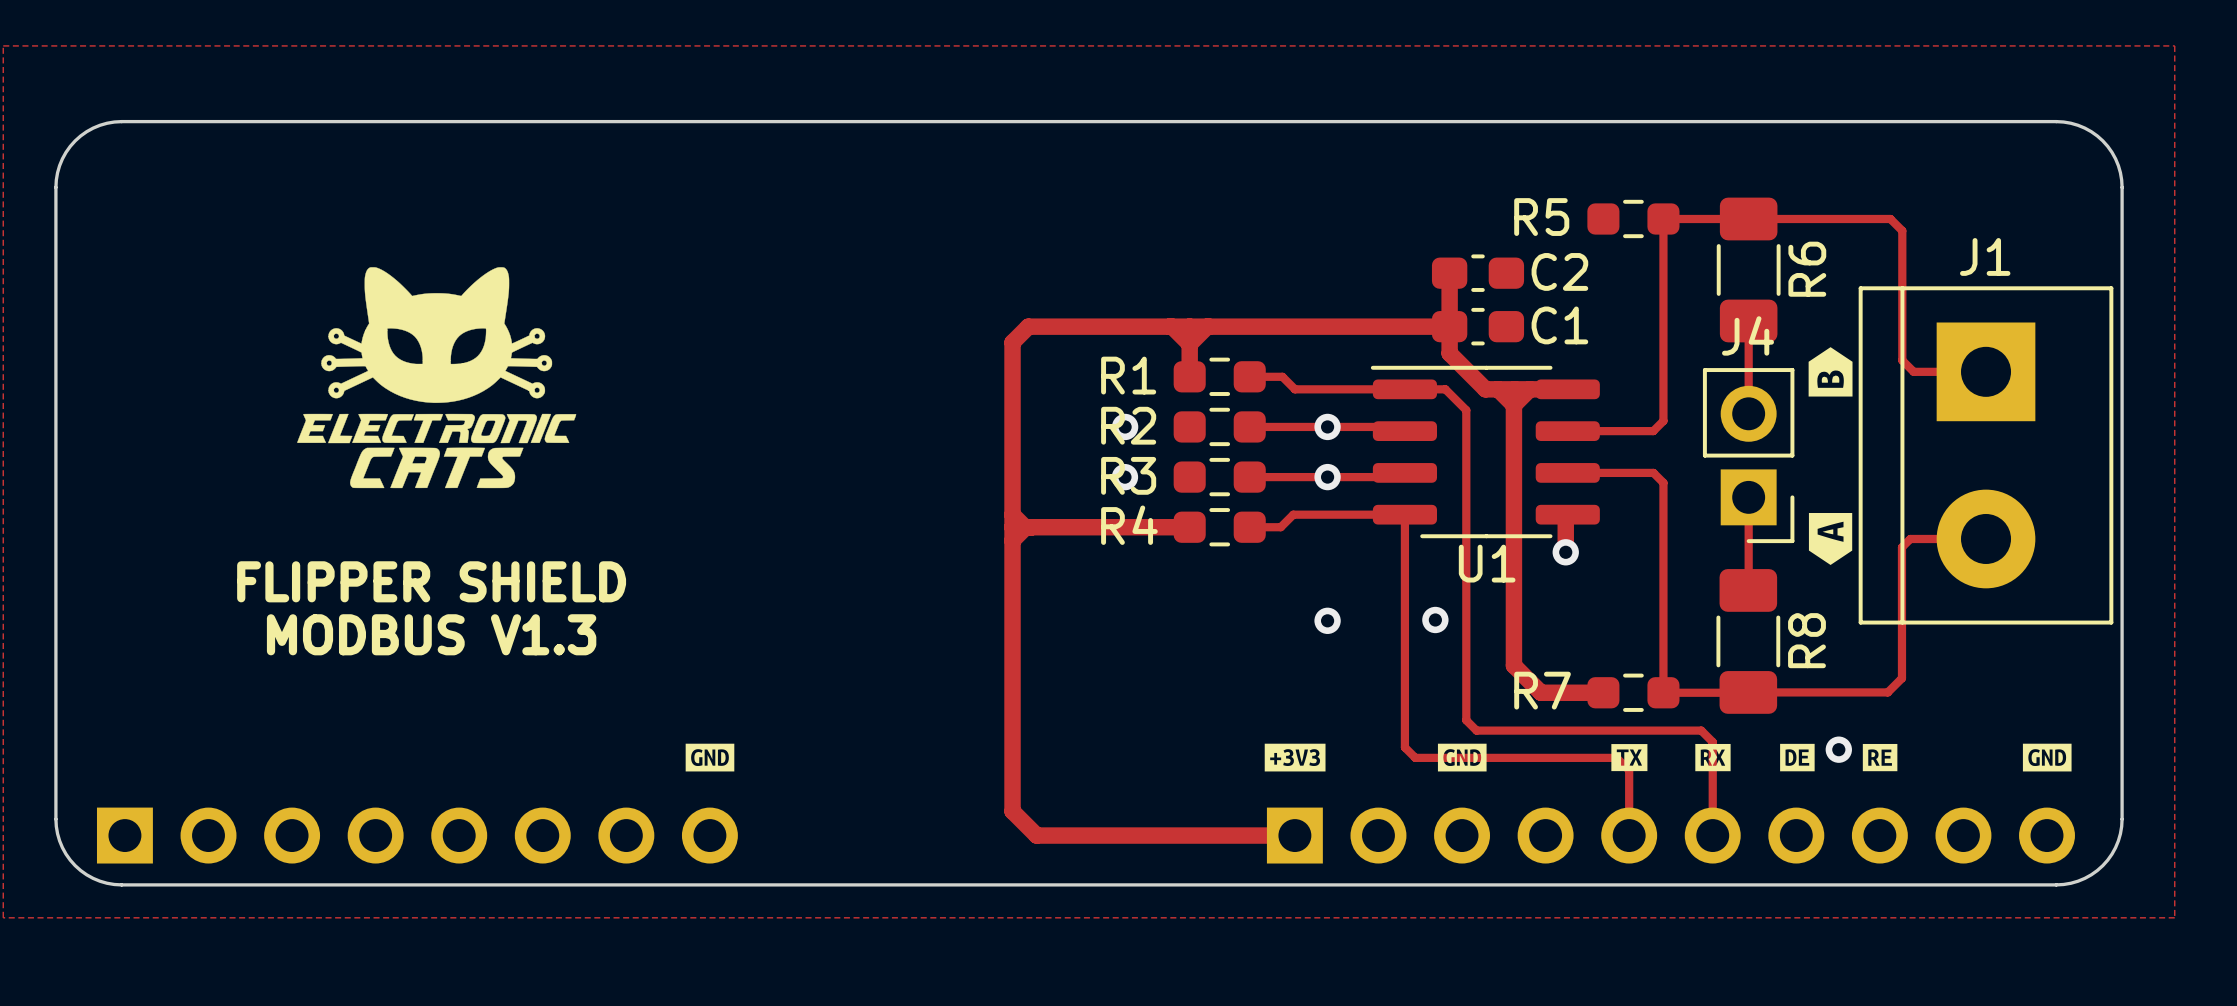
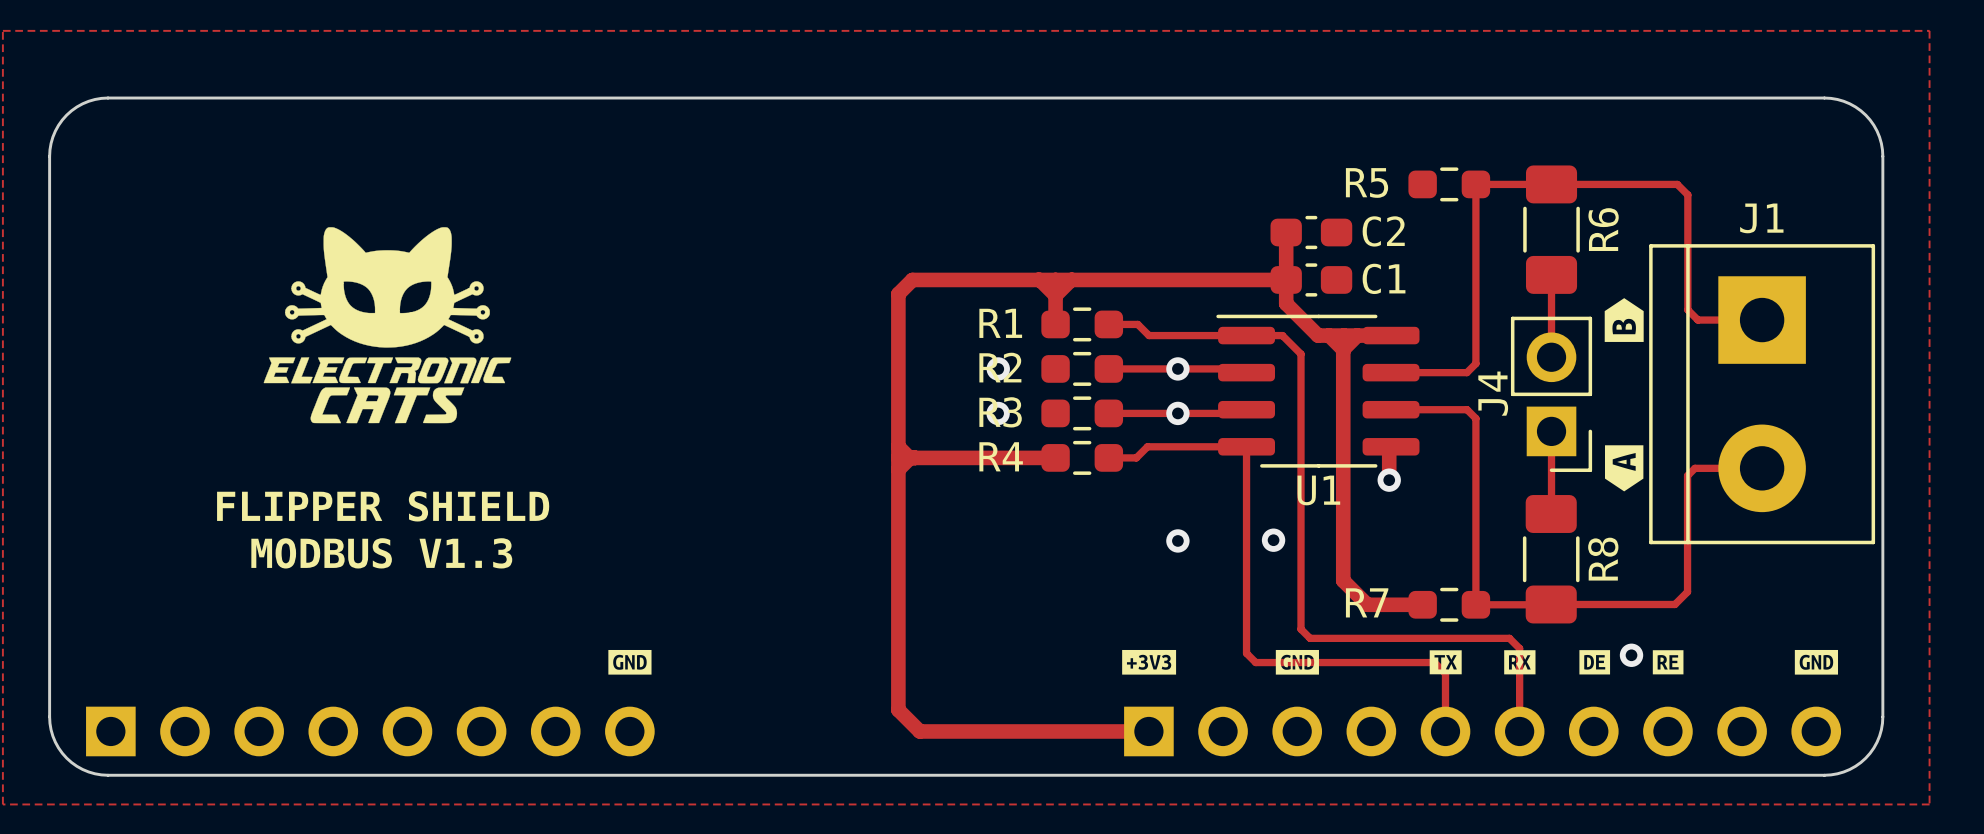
J4 name rotation: 0° (1748, 335) -> 90° counterclockwise (1493, 393)
J4 name position: J4 (1748, 335) -> J4 (1493, 393)

